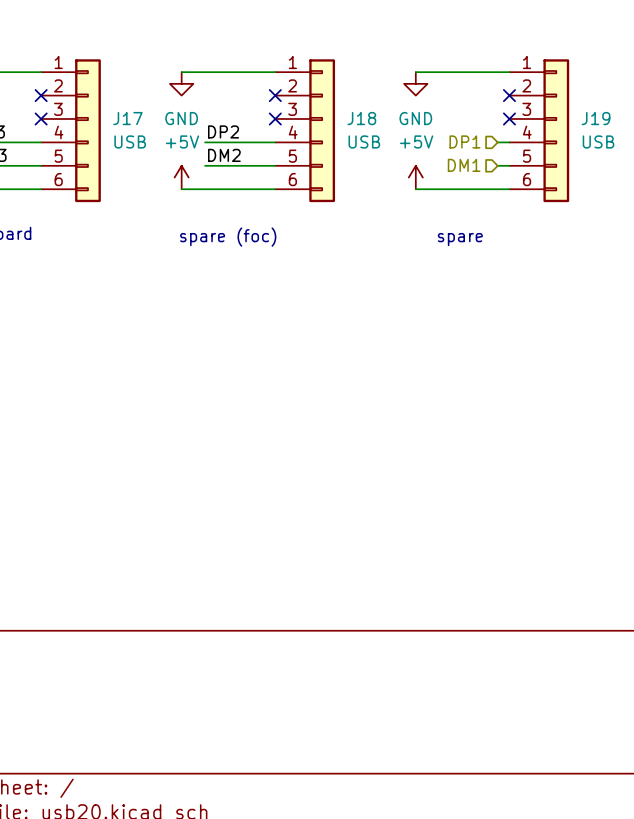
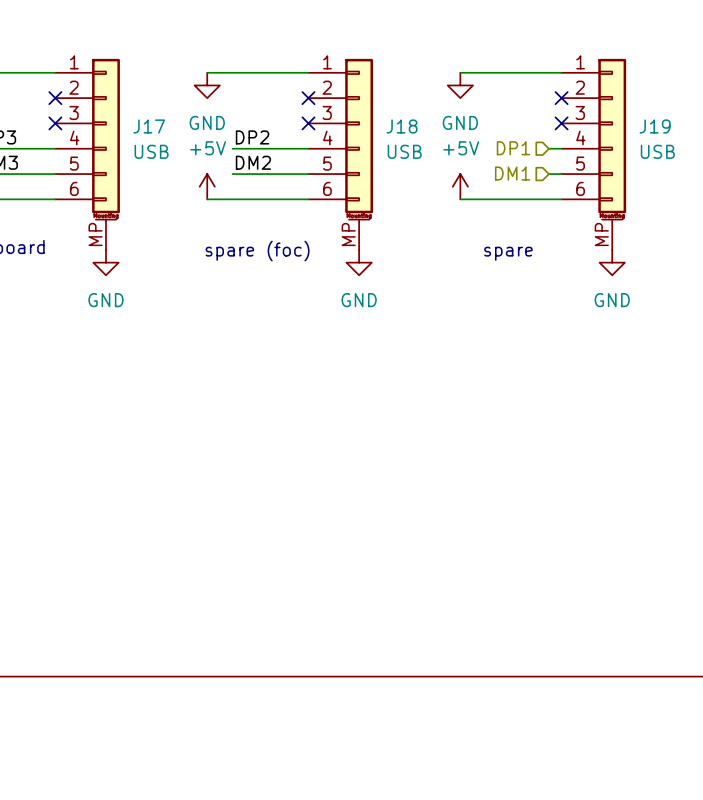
J17 symbol: [41, 59, 101, 203] -> [55, 58, 120, 250]
J18 symbol: [275, 59, 336, 203] -> [308, 58, 374, 250]
J19 symbol: [509, 59, 570, 203] -> [561, 58, 627, 250]
power symbol: none -> GND (105, 262)
power symbol: none -> GND (359, 262)
power symbol: none -> GND (612, 262)

